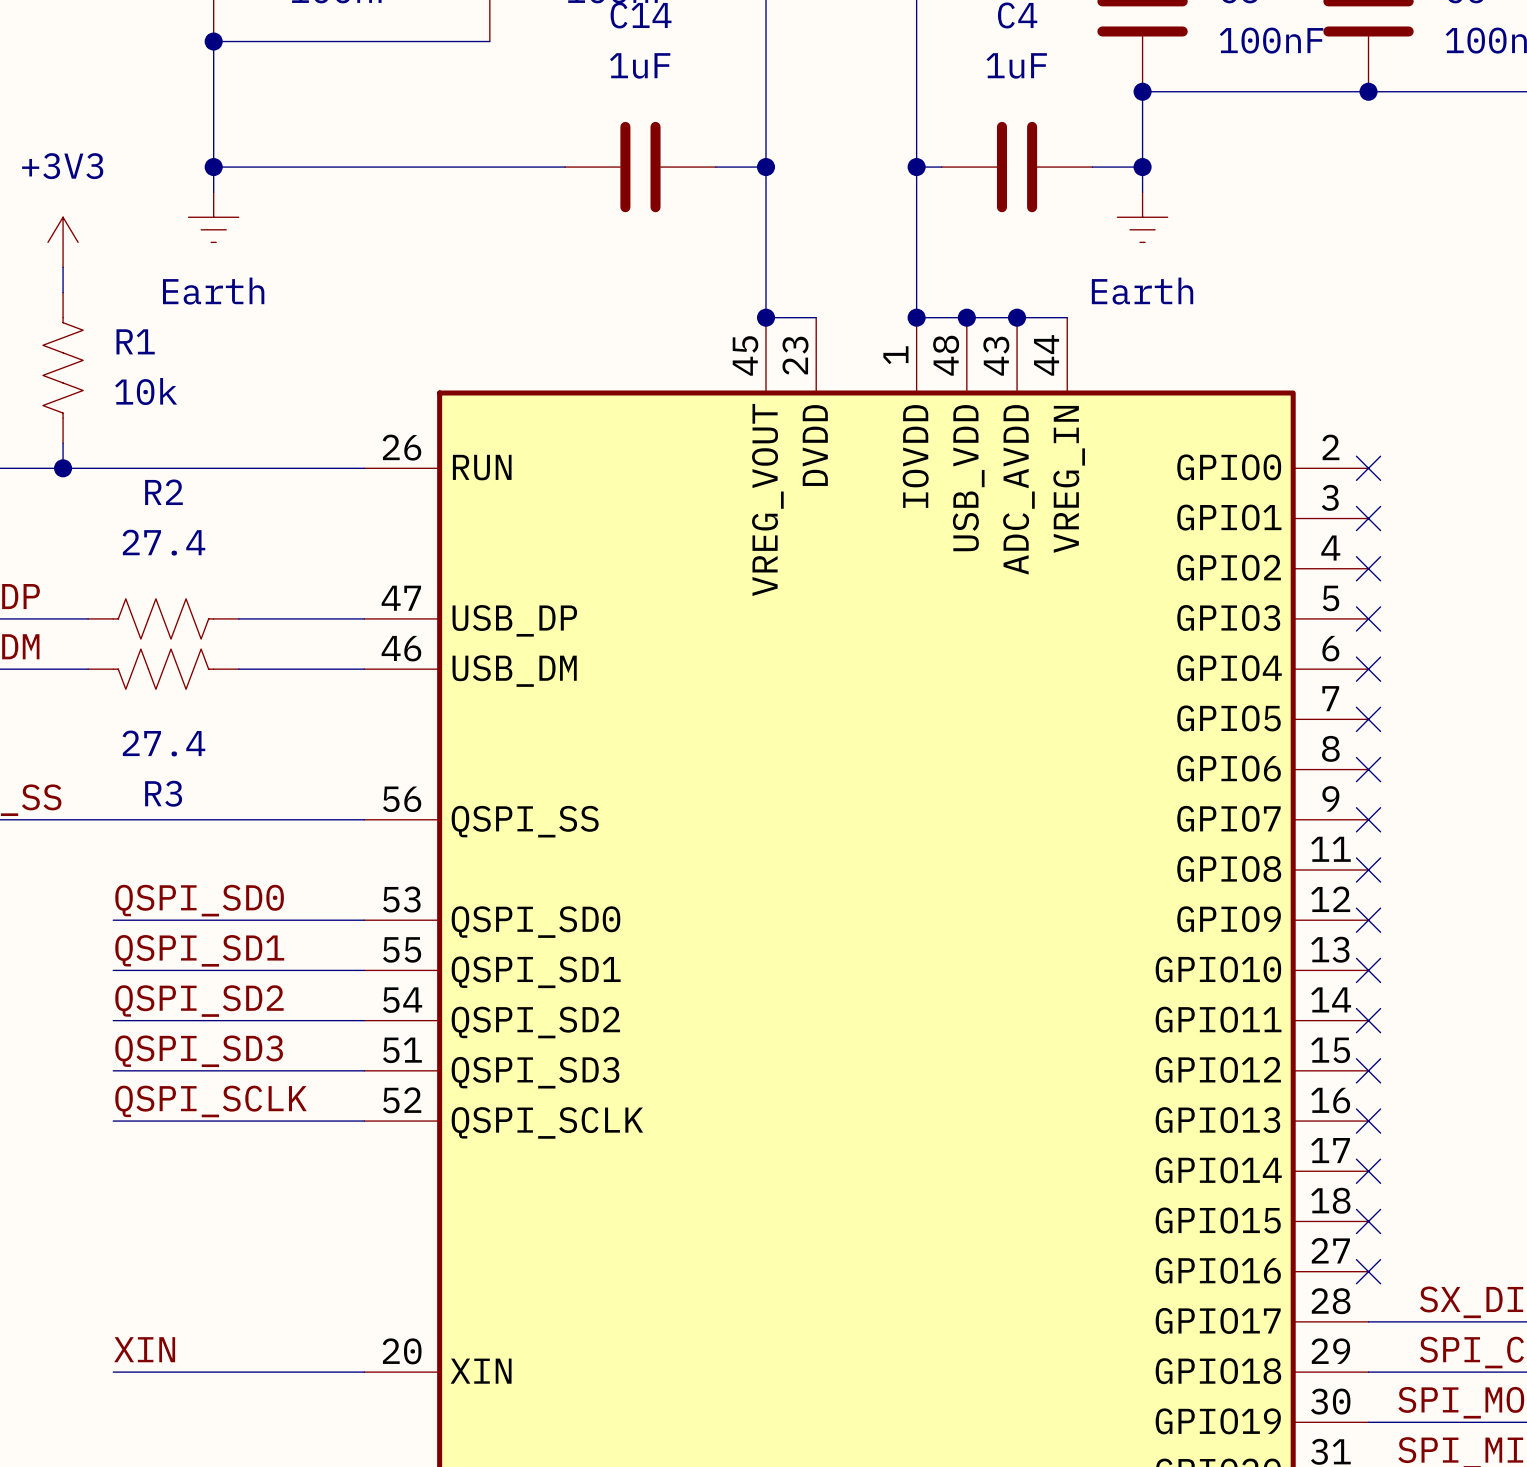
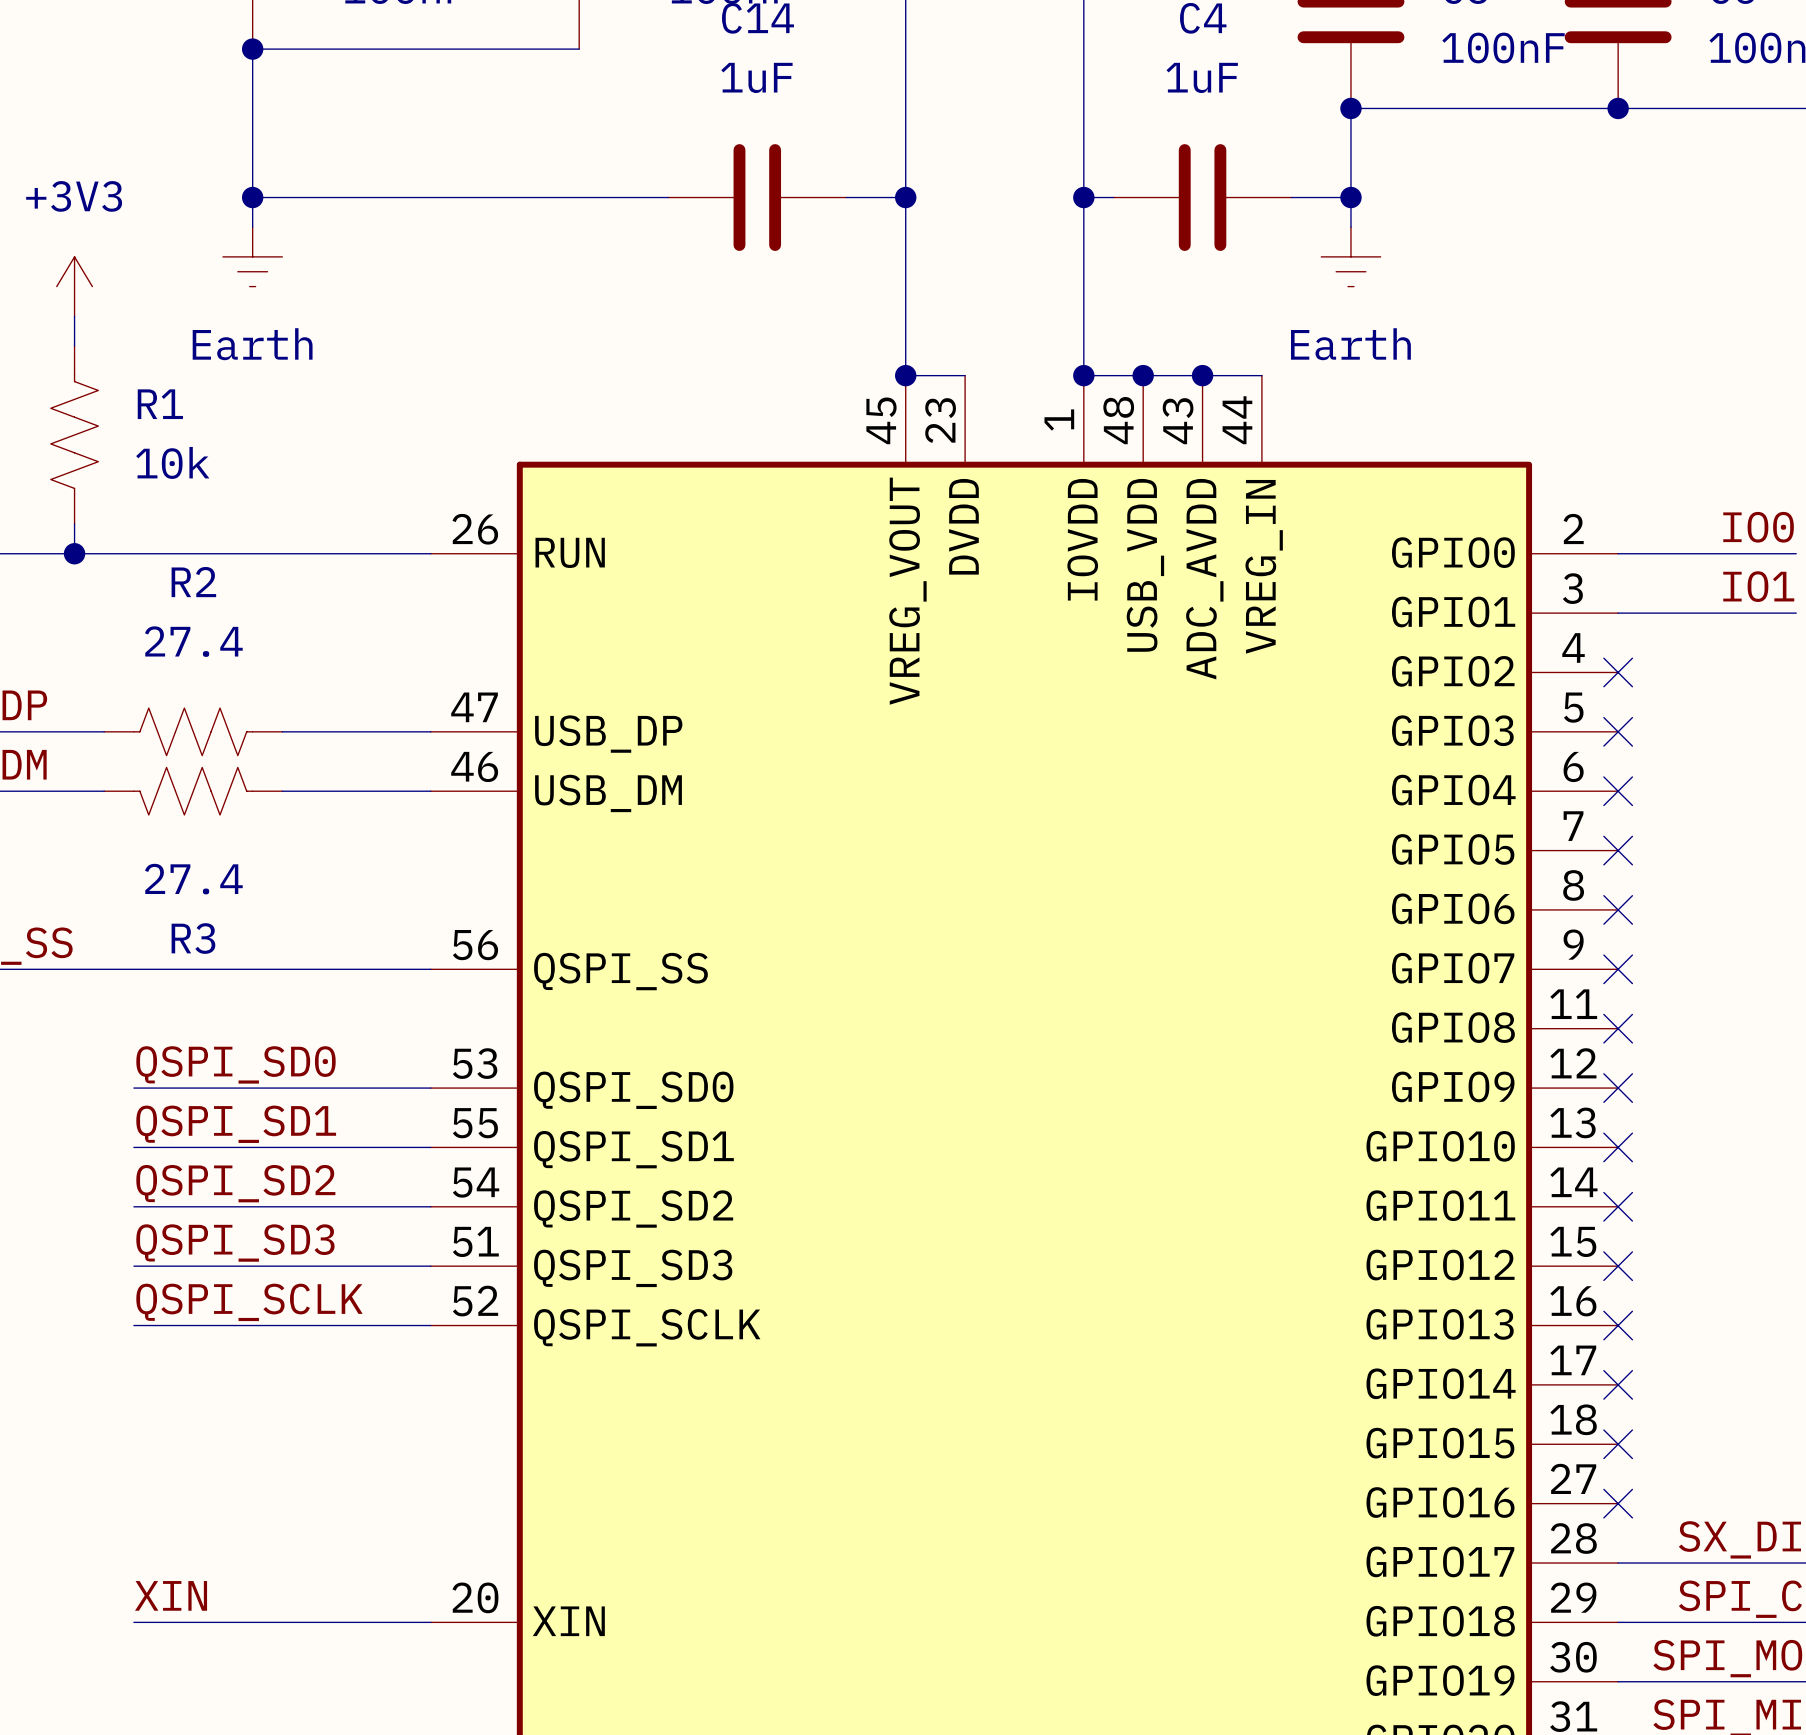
label: none -> IO0 (1758, 527)
wire: none -> (1618, 553) (1796, 553)
no-connect mark: (1368, 468) -> none
label: none -> IO1 (1758, 586)
wire: none -> (1618, 613) (1796, 613)
no-connect mark: (1368, 518) -> none

